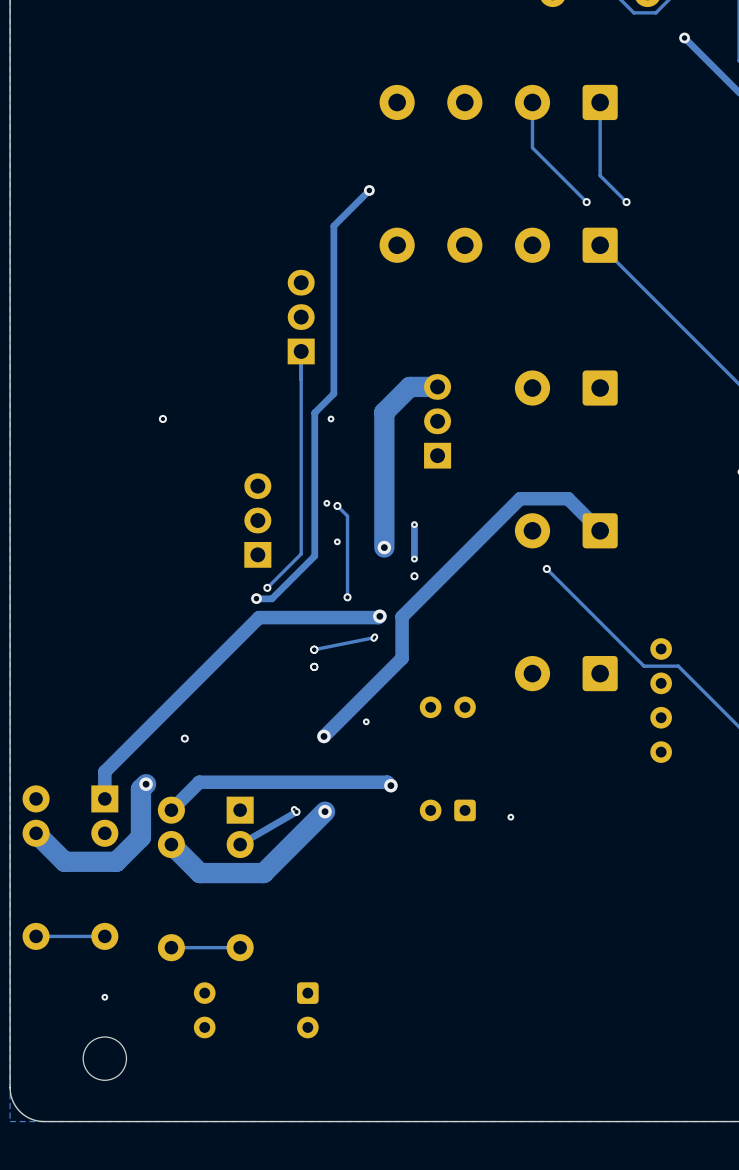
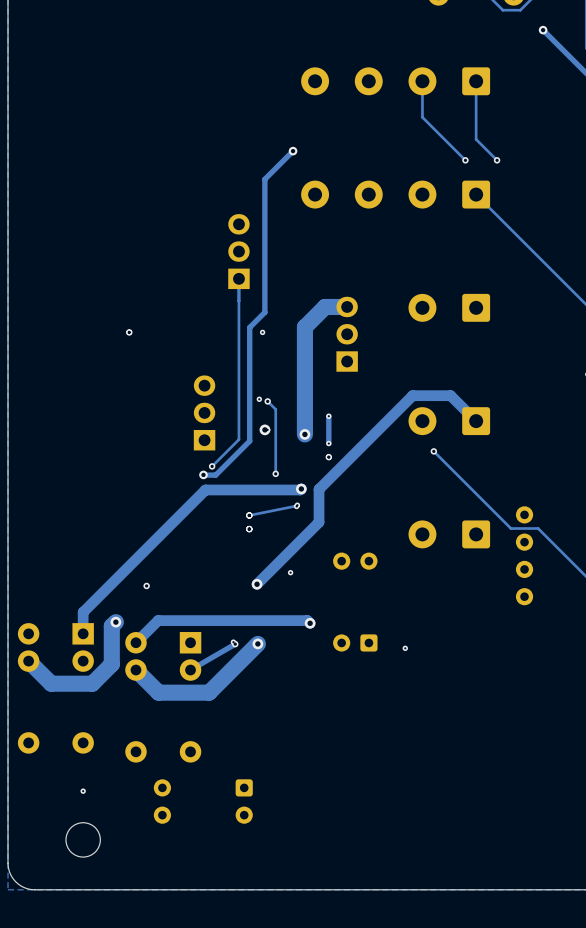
via: none -> (264, 429)
track: (104, 936) (36, 936) -> none
track: (240, 947) (171, 947) -> none

